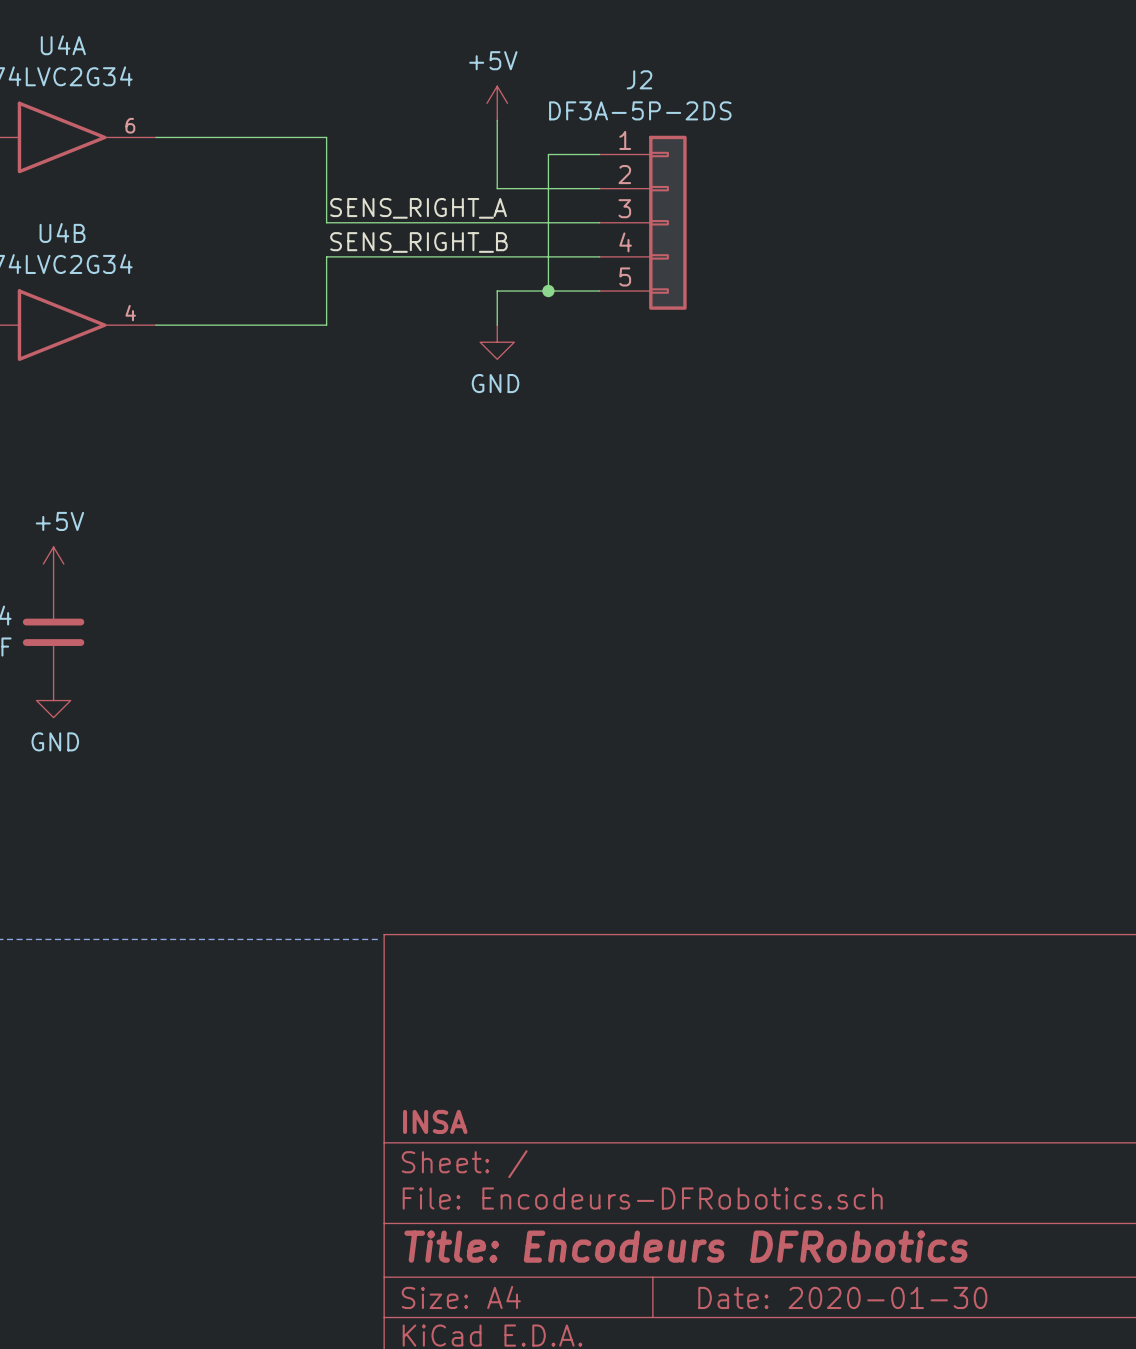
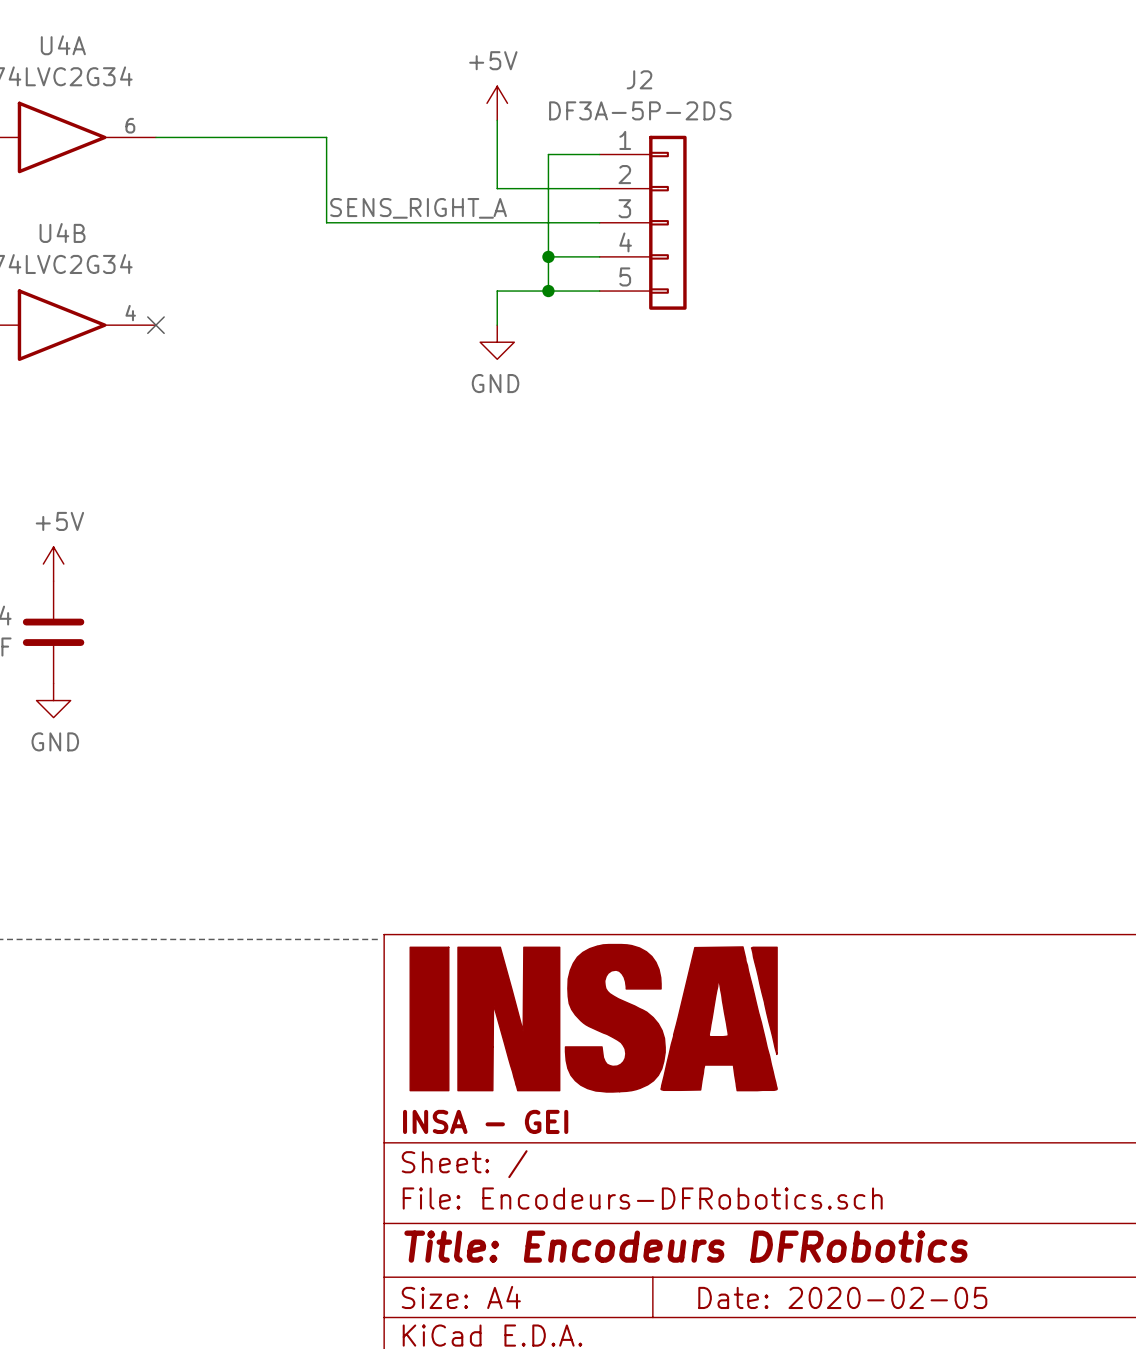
label: SENS_RIGHT_B (418, 242) -> none
wire: (548, 256) (326, 256) (326, 325) (155, 325) -> none
junction: none -> (548, 256)
no-connect mark: none -> (155, 325)
part: none -> (593, 1018)
title block: INSA (435, 1121) -> INSA - GEI (485, 1121)
title block: Date: 2020-01-30 (842, 1297) -> Date: 2020-02-05 (842, 1297)

